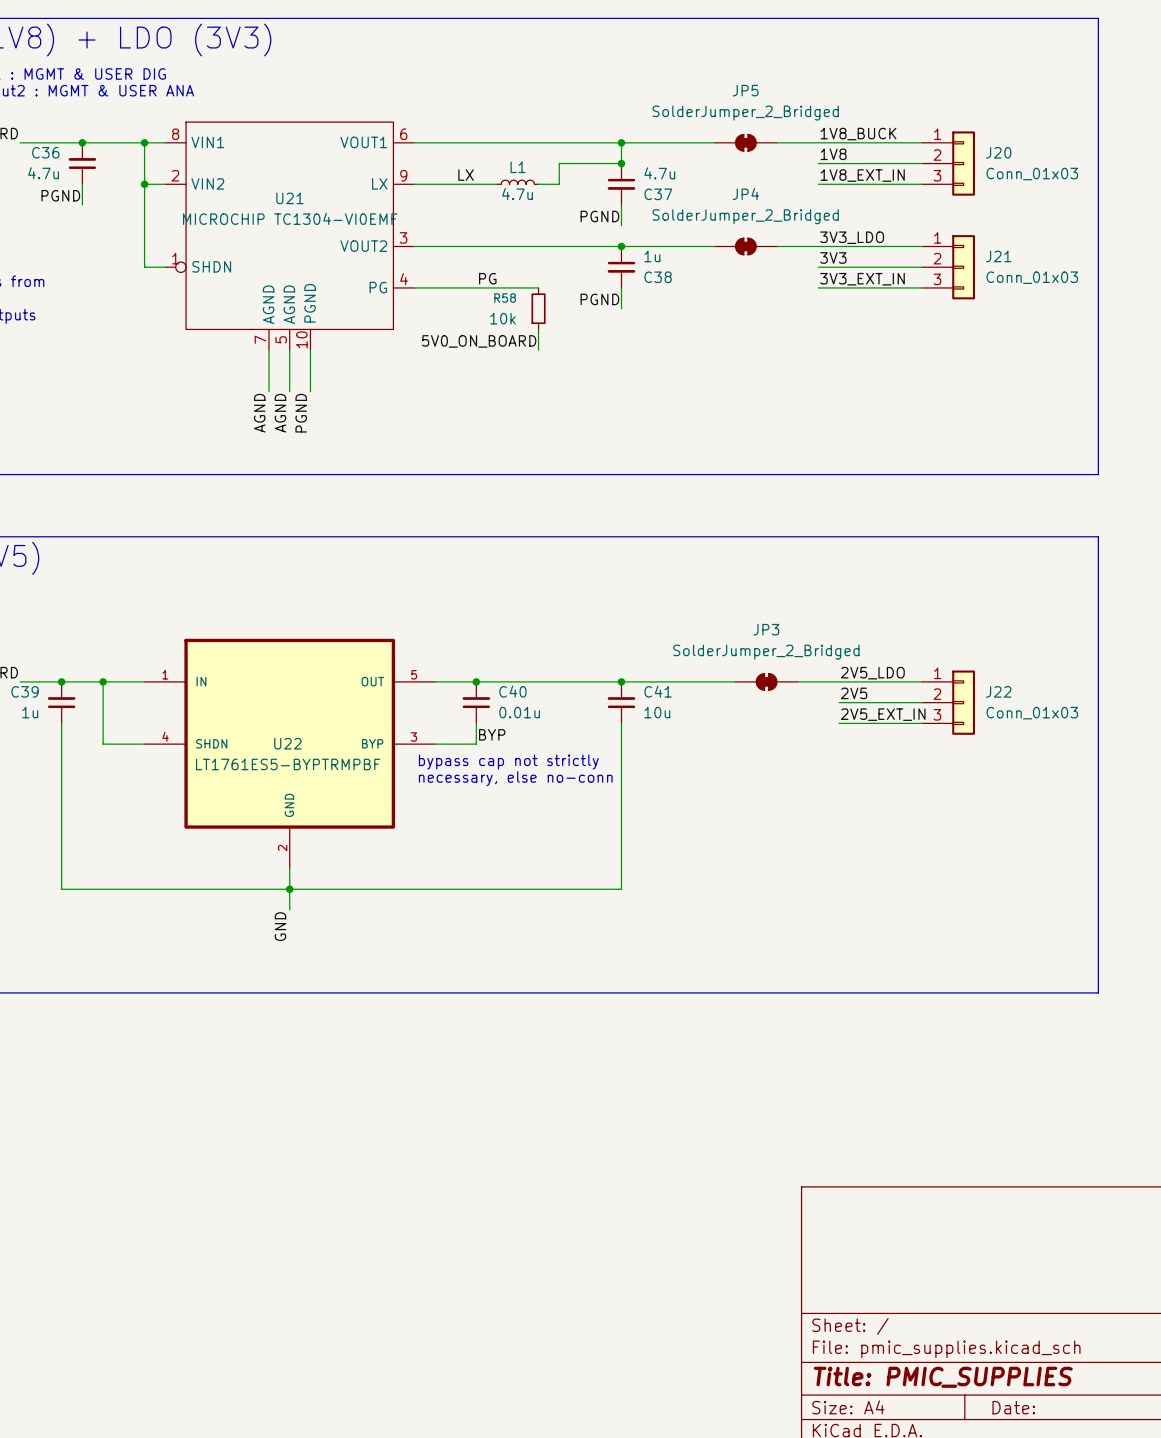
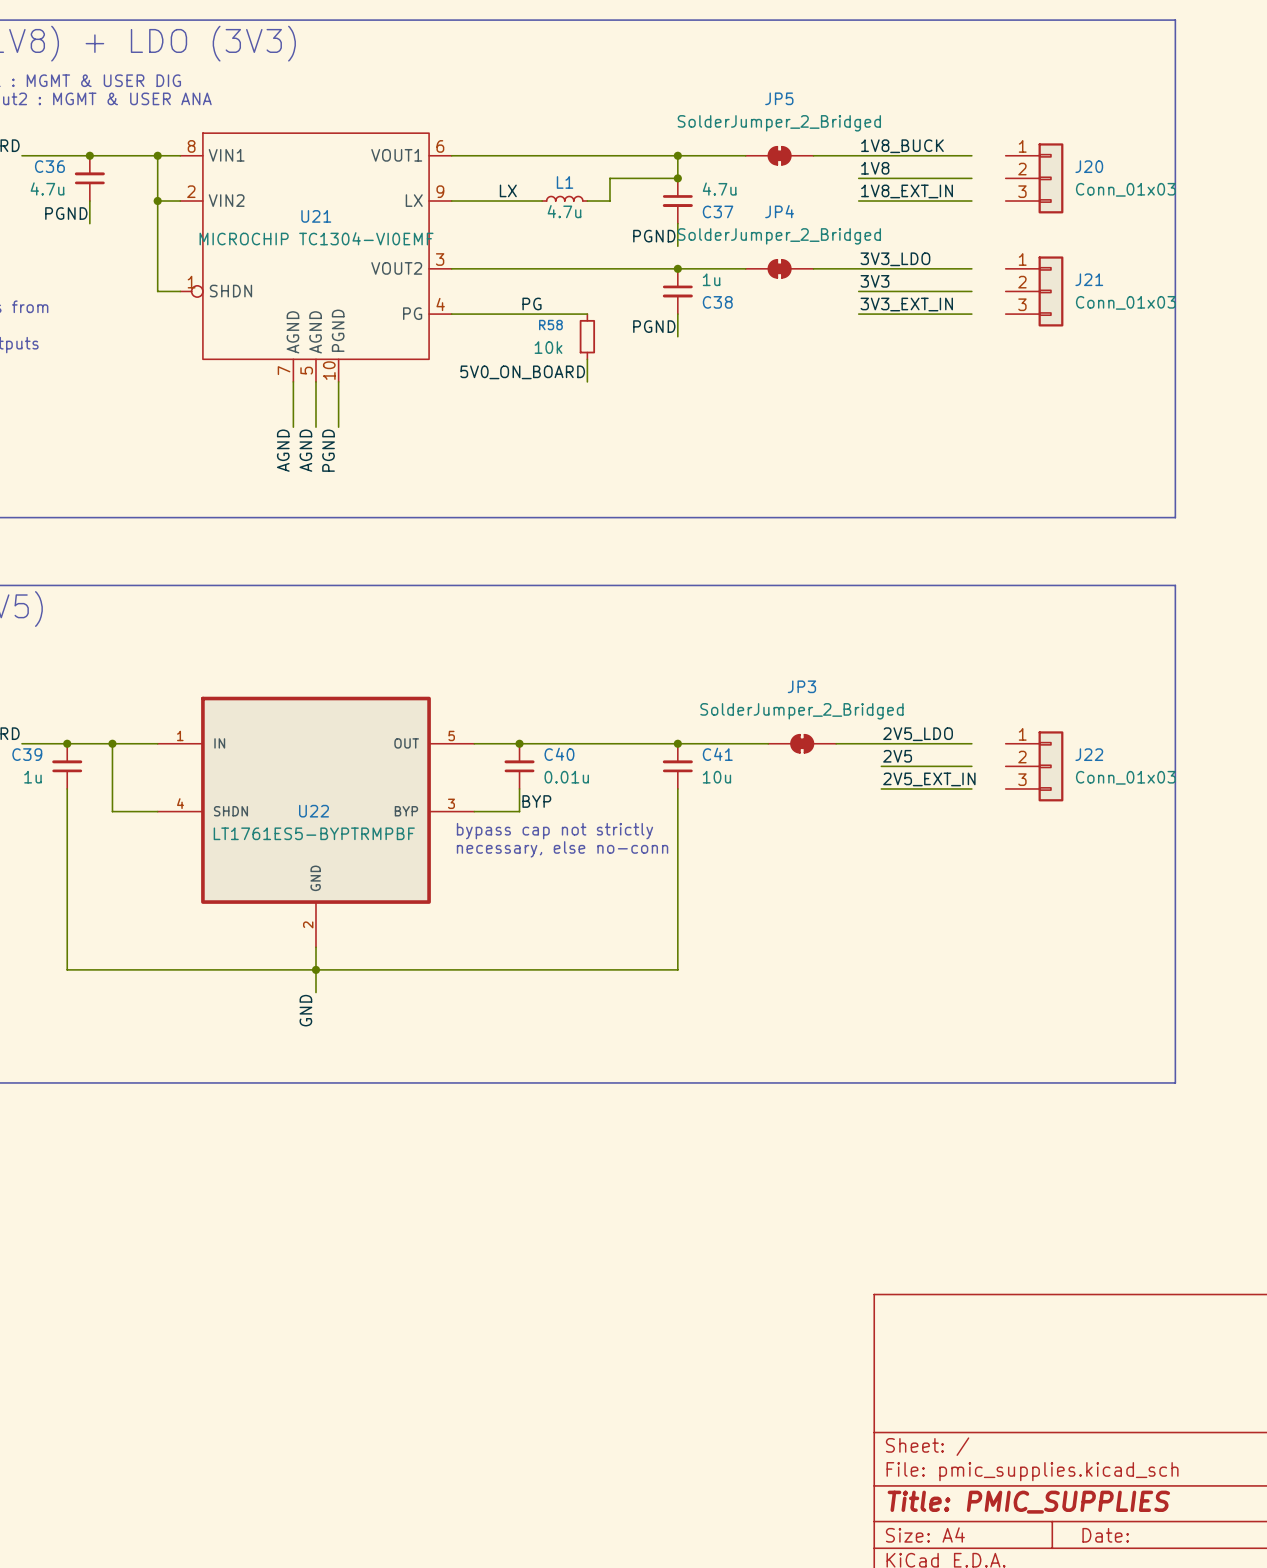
line: (1077, 18) (1098, 18) (1098, 474) (1077, 474) -> (1175, 20) (1175, 517)
label position: 1V8_BUCK (858, 134) -> 1V8_BUCK (902, 146)
JP5 position: (745, 142) -> (779, 155)
wire: (891, 142) (922, 142) -> none
label position: 1V8 (833, 154) -> 1V8 (875, 168)
wire: (891, 163) (922, 163) -> (858, 178) (892, 178)
label position: 1V8_EXT_IN (862, 175) -> 1V8_EXT_IN (907, 191)
wire: (891, 184) (922, 184) -> (858, 201) (892, 201)
label position: 3V3_LDO (852, 237) -> 3V3_LDO (895, 259)
JP4 position: (745, 246) -> (779, 268)
wire: (891, 246) (922, 246) -> none
label position: 3V3 (833, 257) -> 3V3 (874, 281)
wire: (891, 267) (922, 267) -> (858, 291) (892, 291)
label position: 3V3_EXT_IN (862, 279) -> 3V3_EXT_IN (906, 304)
wire: (891, 287) (922, 287) -> (858, 314) (892, 314)
line: (1077, 536) (1098, 536) (1098, 992) (1077, 992) -> (1175, 585) (1175, 1082)
label position: 2V5_LDO (872, 673) -> 2V5_LDO (918, 734)
JP3 position: (766, 681) -> (802, 743)
wire: (891, 681) (922, 681) -> none
label position: 2V5 (854, 693) -> 2V5 (897, 756)
wire: (891, 702) (922, 702) -> (881, 766) (915, 766)
label position: 2V5_EXT_IN (883, 714) -> 2V5_EXT_IN (929, 779)
wire: (891, 723) (922, 723) -> (881, 788) (915, 788)

